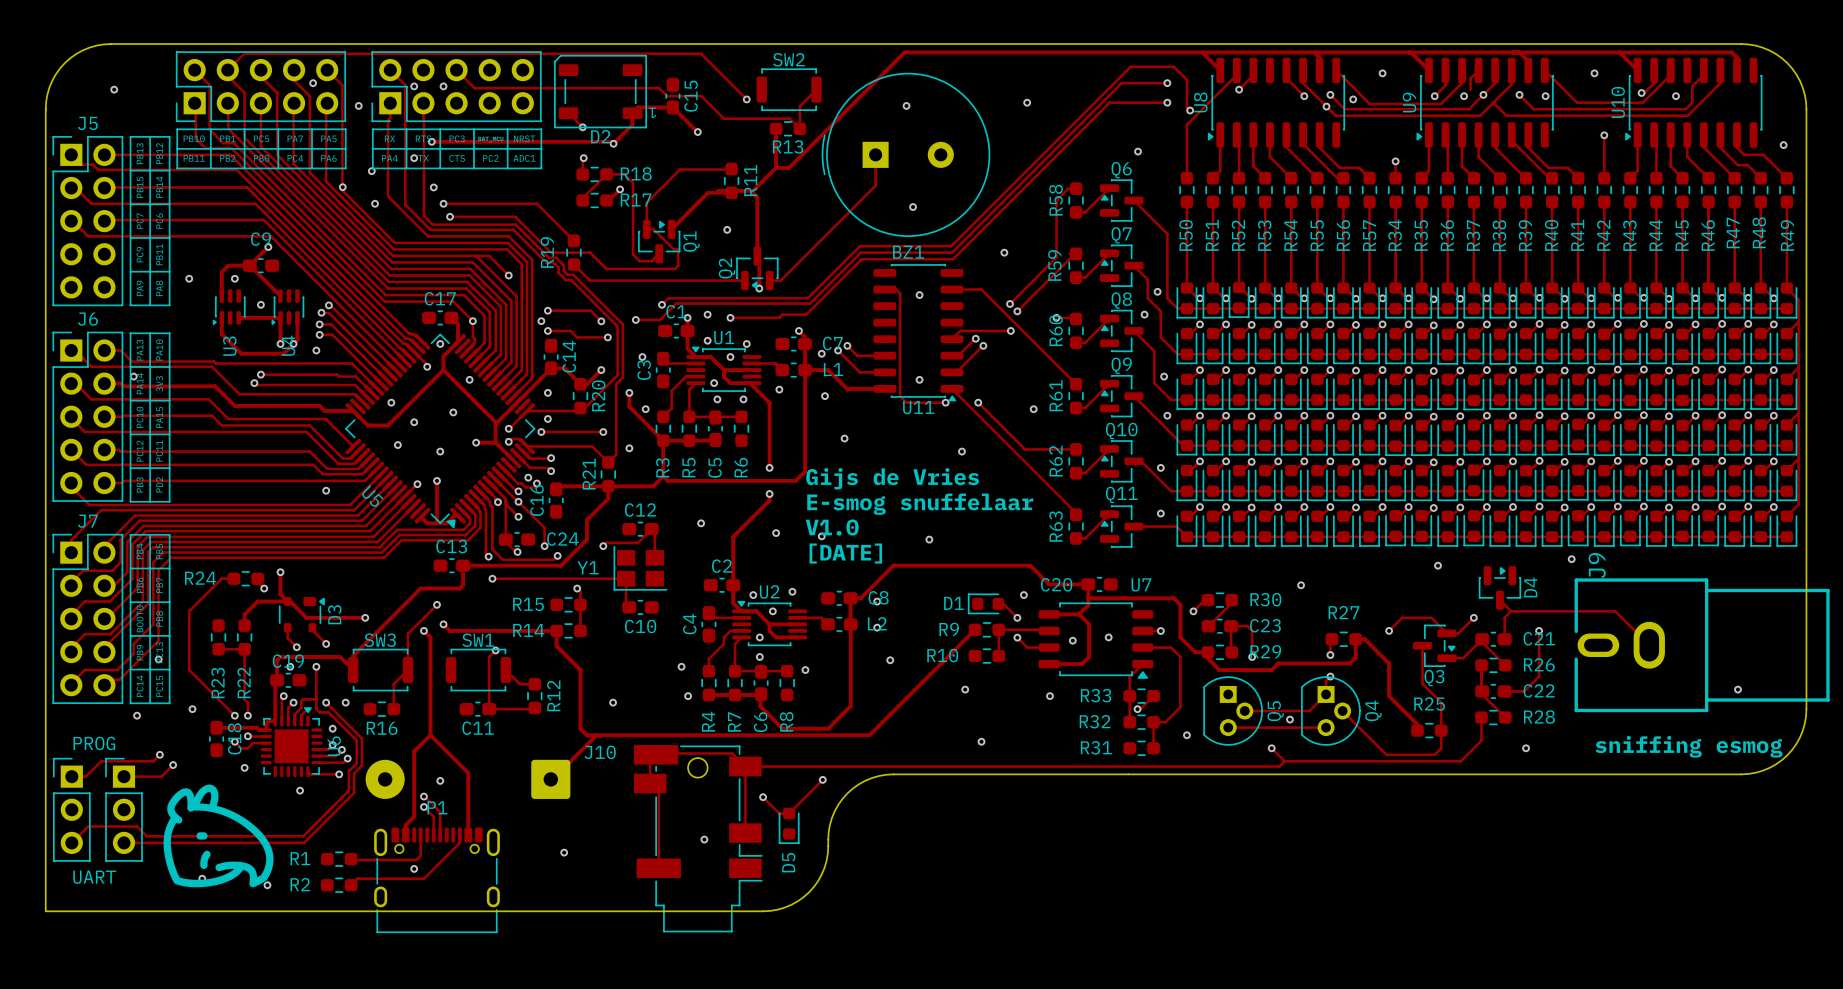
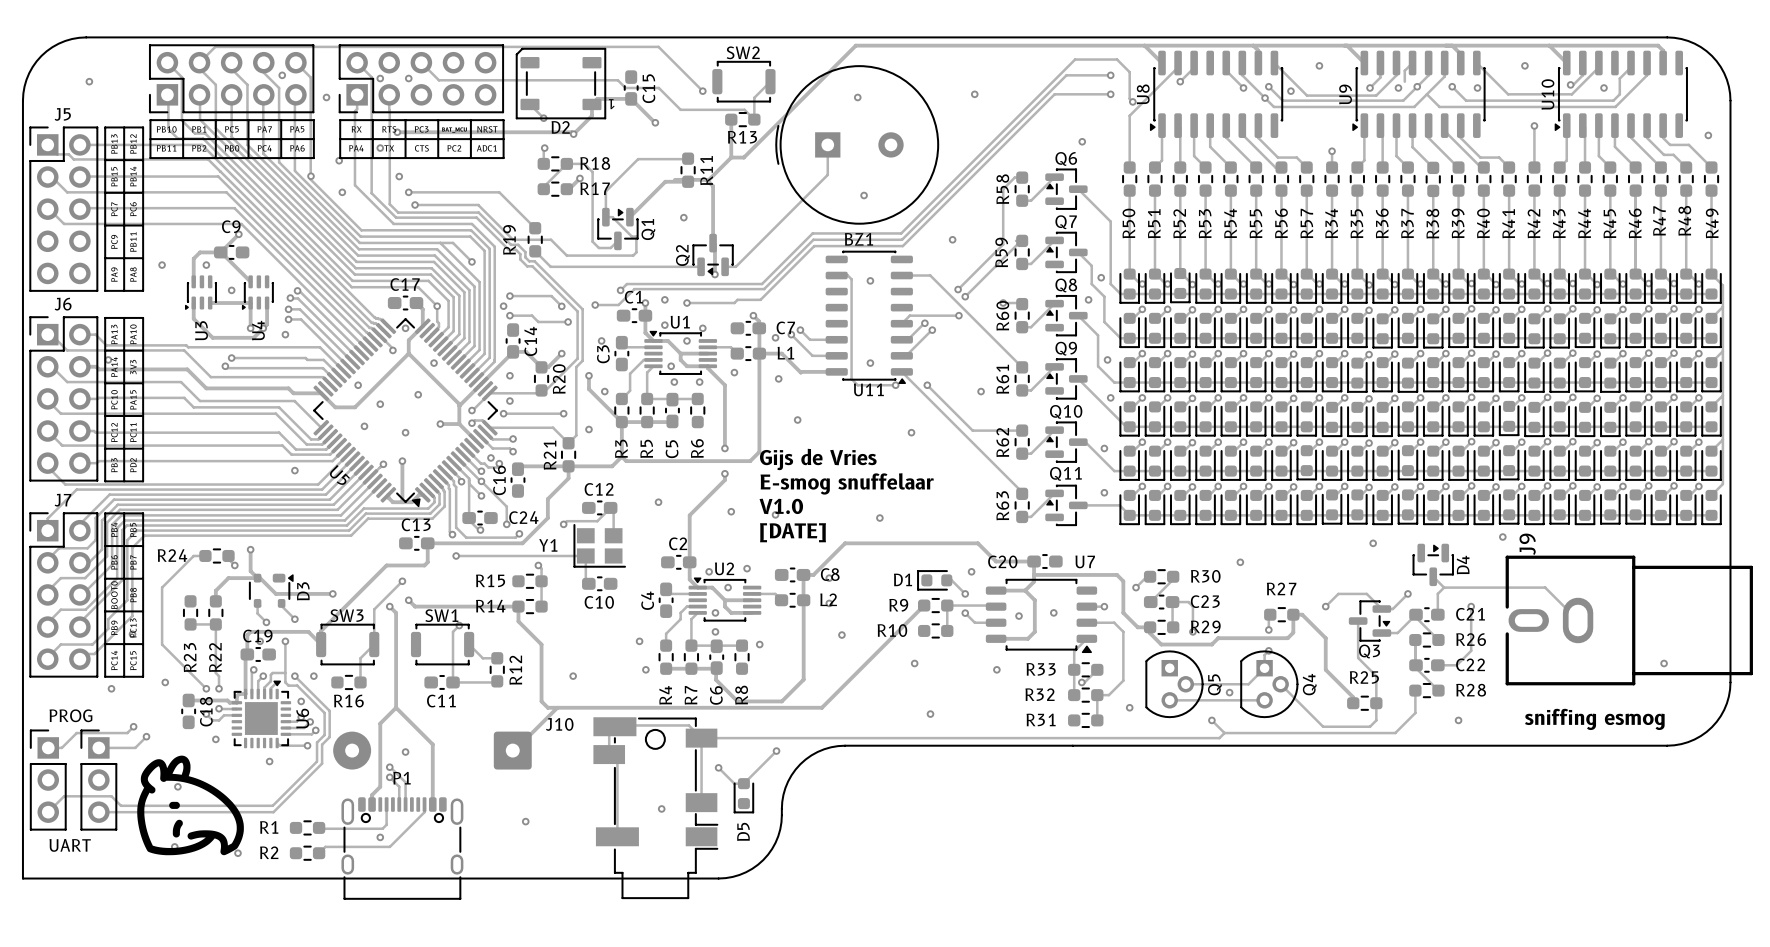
via: none -> (177, 786)

